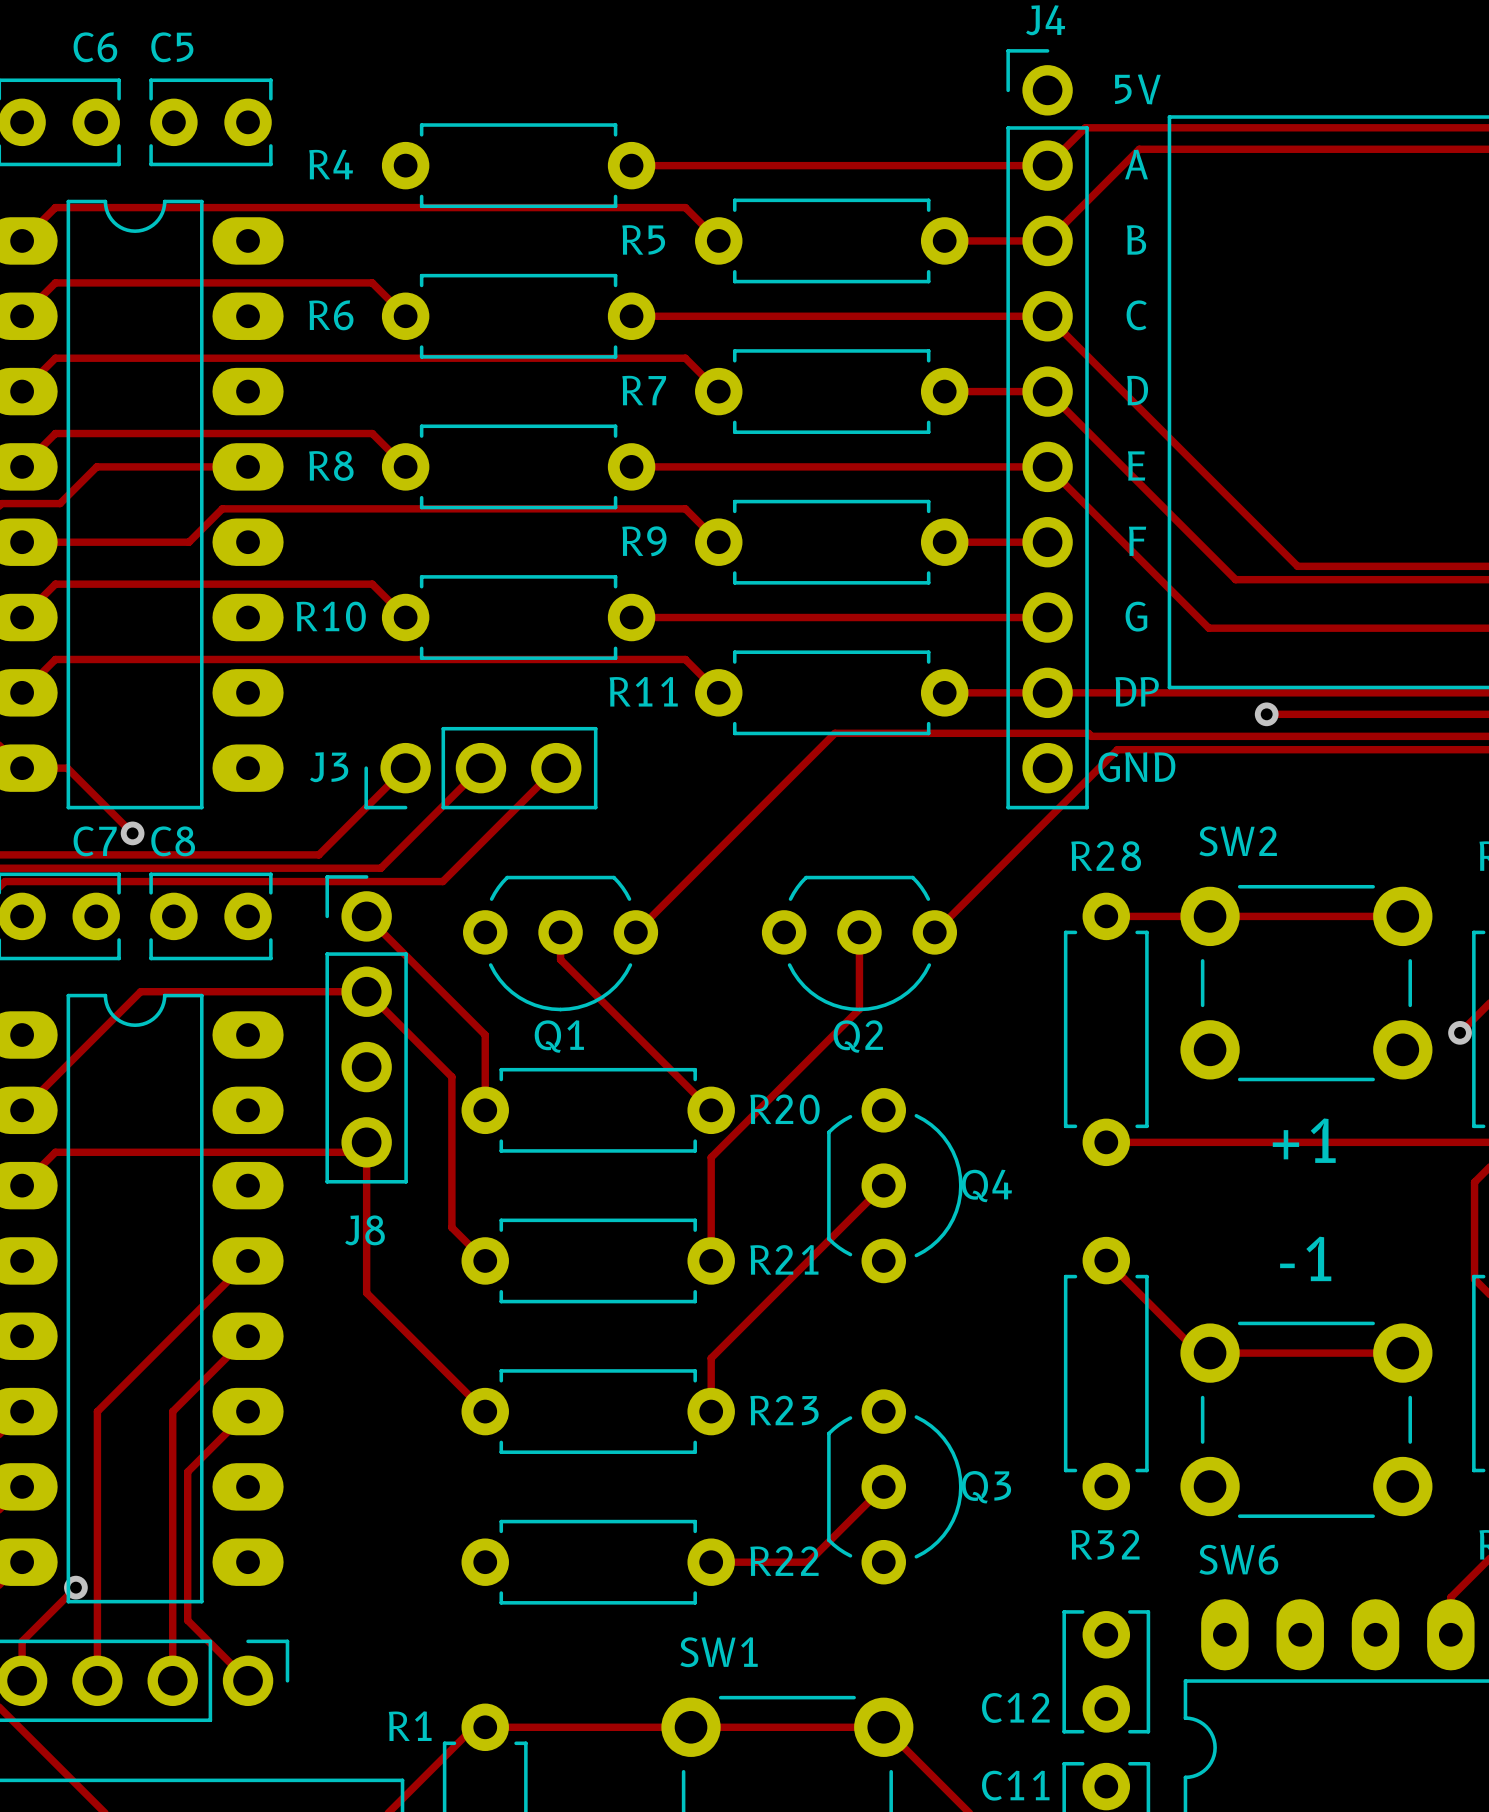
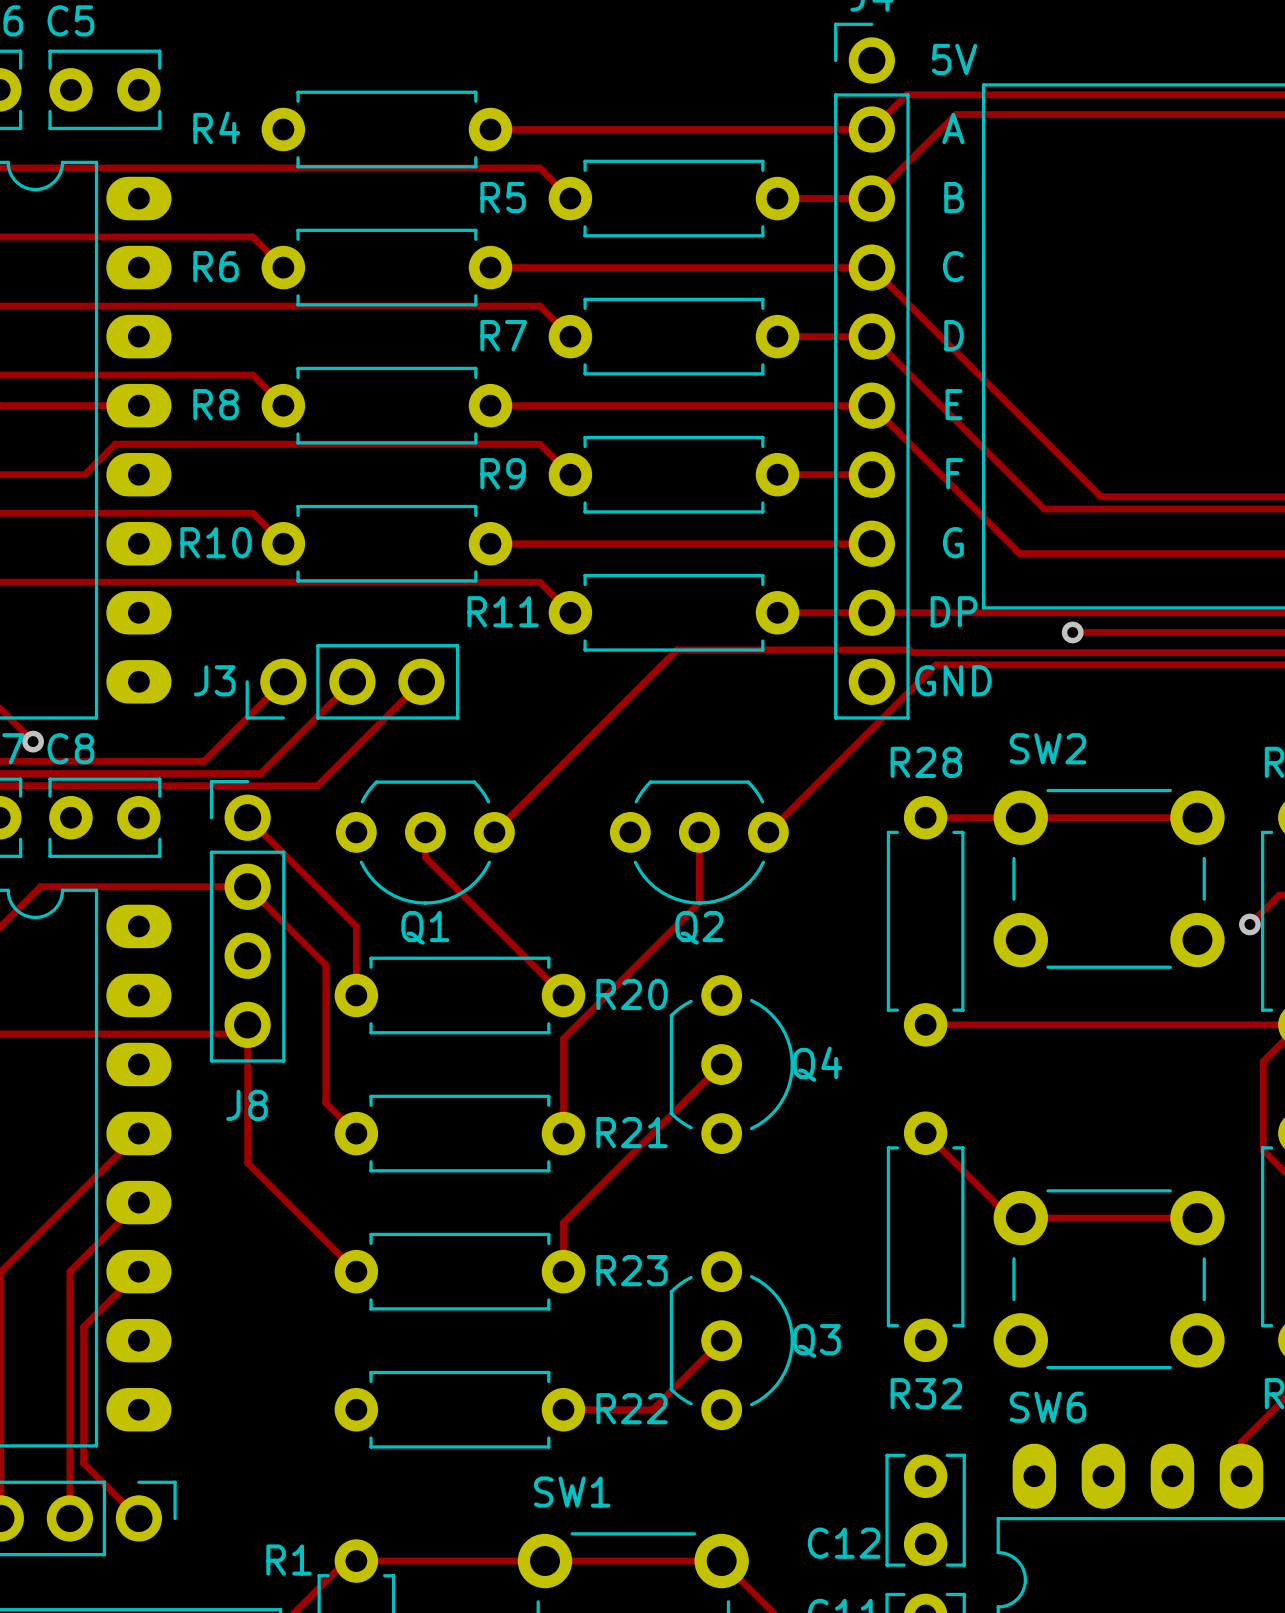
text: +1 (1304, 1140) -> none
text: -1 (1305, 1258) -> none

